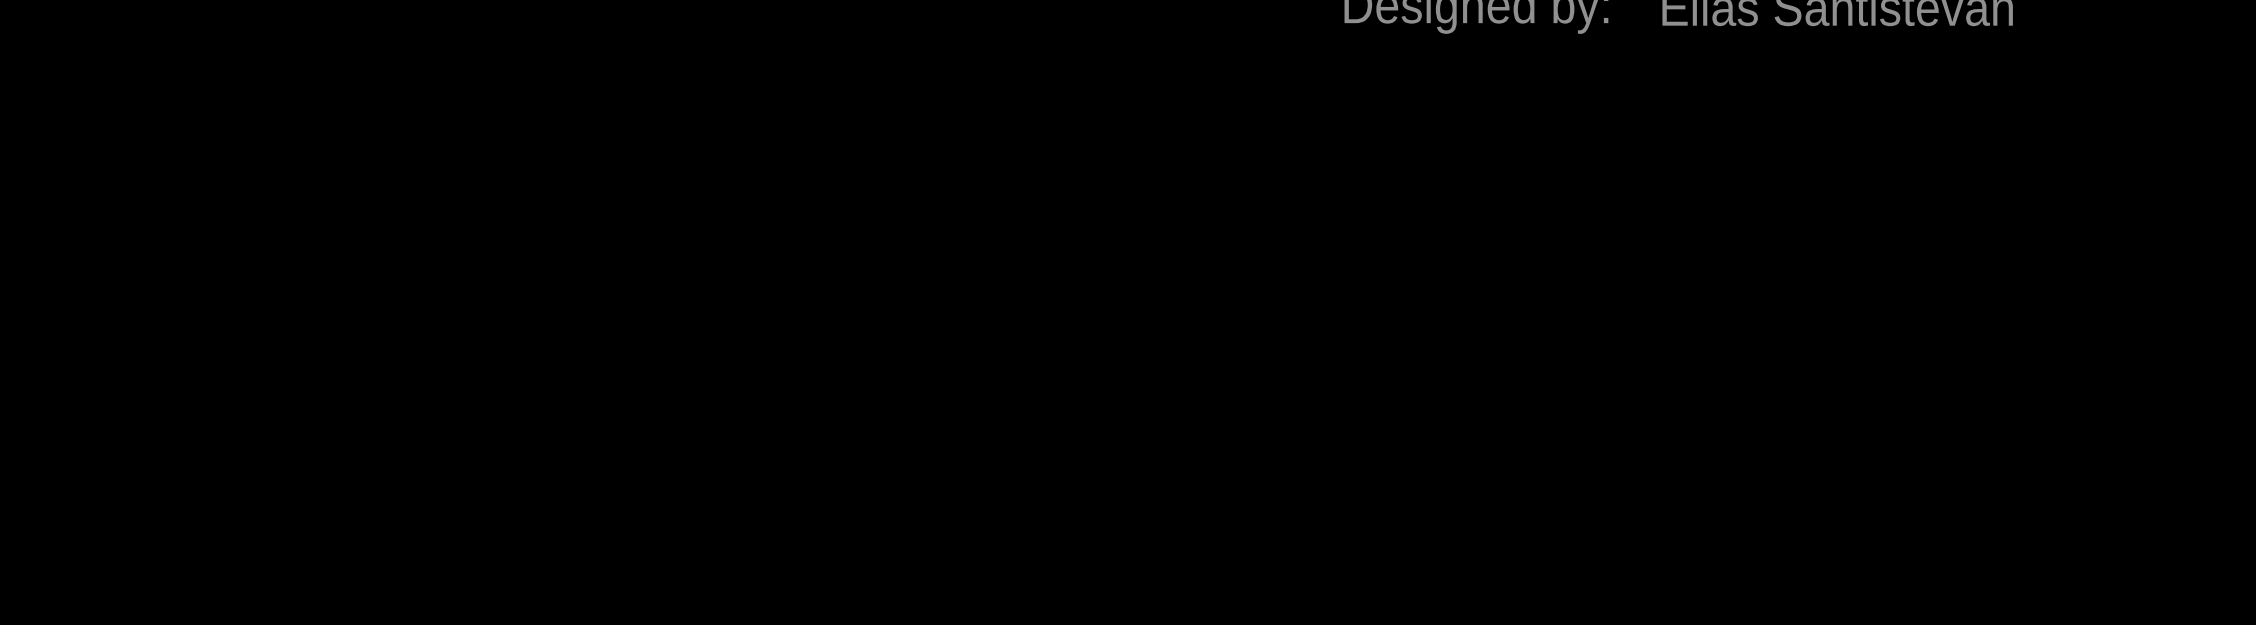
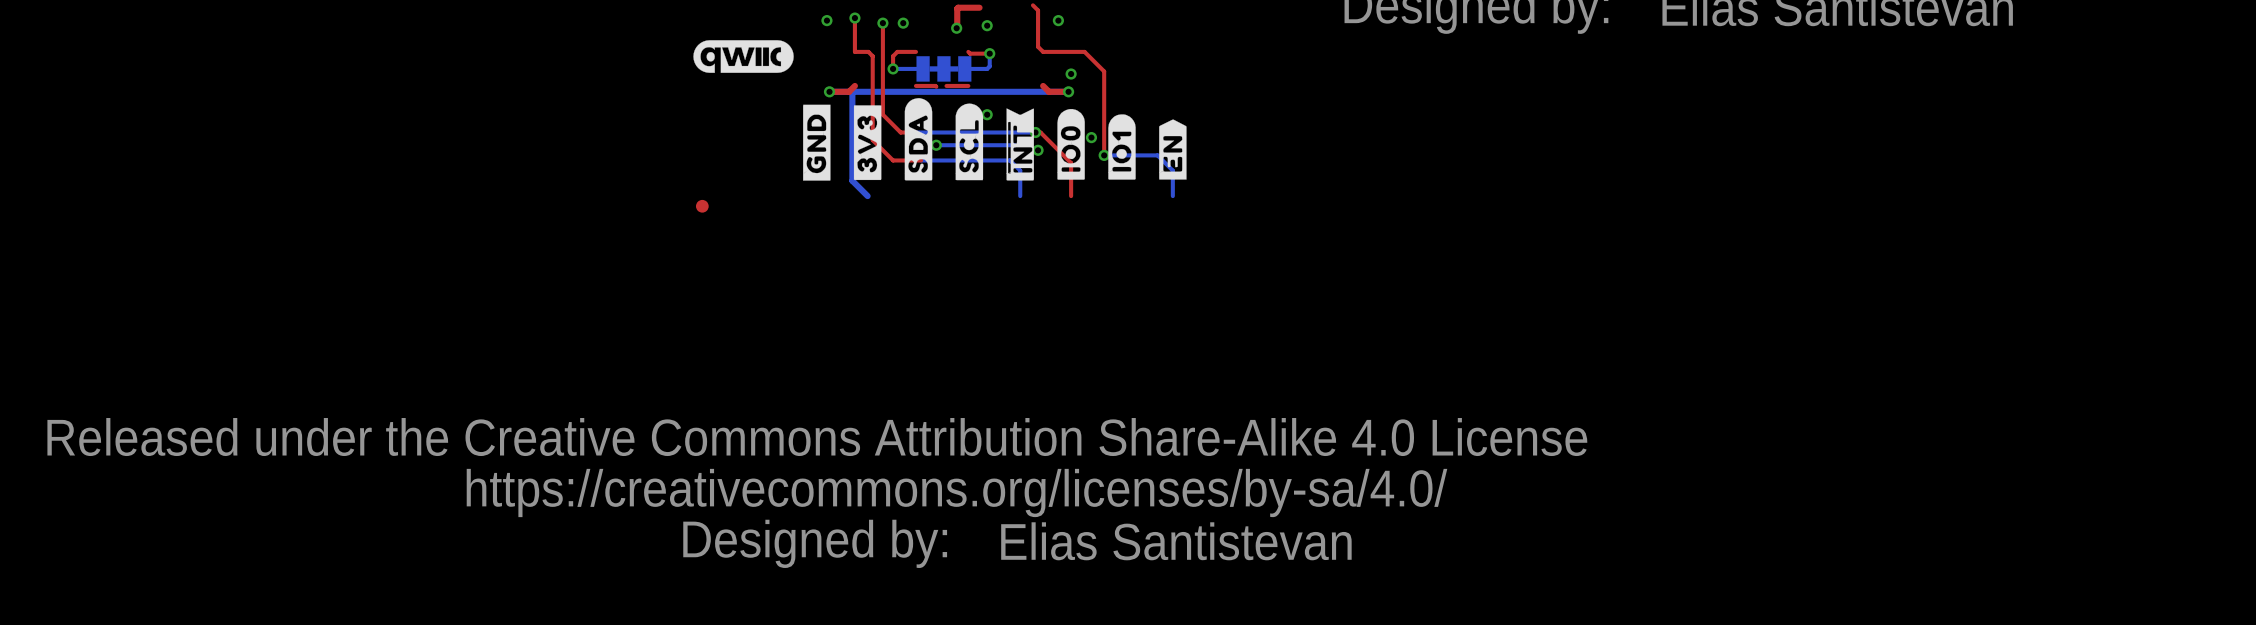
top track: none -> (1032, 5) (1038, 10) (1038, 46) (1043, 51) (1084, 51) (1104, 71) (1104, 155)
top track: none -> (979, 7) (958, 7) (956, 28)
top track: none -> (854, 18) (854, 51) (868, 51) (872, 56) (872, 140) (893, 160) (921, 160)
via: none -> (854, 18)
via: none -> (826, 20)
via: none -> (1058, 20)
top track: none -> (882, 23) (882, 114) (900, 132) (915, 132)
via: none -> (882, 23)
via: none -> (903, 23)
via: none -> (987, 25)
via: none -> (956, 28)
drawing: none -> [693, 40, 794, 73]
top track: none -> (915, 51) (897, 51) (893, 56) (893, 68)
top track: none -> (968, 51) (970, 53) (989, 53)
bottom track: none -> (989, 53) (989, 66) (987, 68) (964, 68)
via: none -> (989, 53)
bottom track: none -> (893, 68) (923, 68)
via: none -> (893, 68)
part: none -> (943, 68)
via: none -> (1071, 74)
top track: none -> (854, 85) (849, 91) (829, 91)
top track: none -> (915, 85) (936, 86)
top track: none -> (946, 85) (968, 85)
top track: none -> (1043, 85) (1049, 91) (1068, 91)
bottom track: none -> (829, 91) (1068, 91)
via: none -> (829, 91)
bottom track: none -> (852, 91) (852, 180) (867, 196)
via: none -> (1068, 91)
drawing: none -> [803, 98, 1187, 181]
via: none -> (987, 114)
bottom track: none -> (915, 132) (1035, 132)
top track: none -> (1035, 132) (1040, 132) (1071, 163) (1071, 196)
via: none -> (1035, 132)
via: none -> (1091, 137)
bottom track: none -> (936, 145) (1015, 145)
via: none -> (936, 145)
via: none -> (1038, 150)
bottom track: none -> (1104, 155) (1157, 155) (1172, 170) (1172, 196)
via: none -> (1104, 155)
bottom track: none -> (921, 160) (1010, 160) (1020, 170) (1020, 196)
part: none -> (702, 206)
drawing: none -> [47, 418, 1588, 568]
text: none -> Elias Santistevan (1176, 541)

